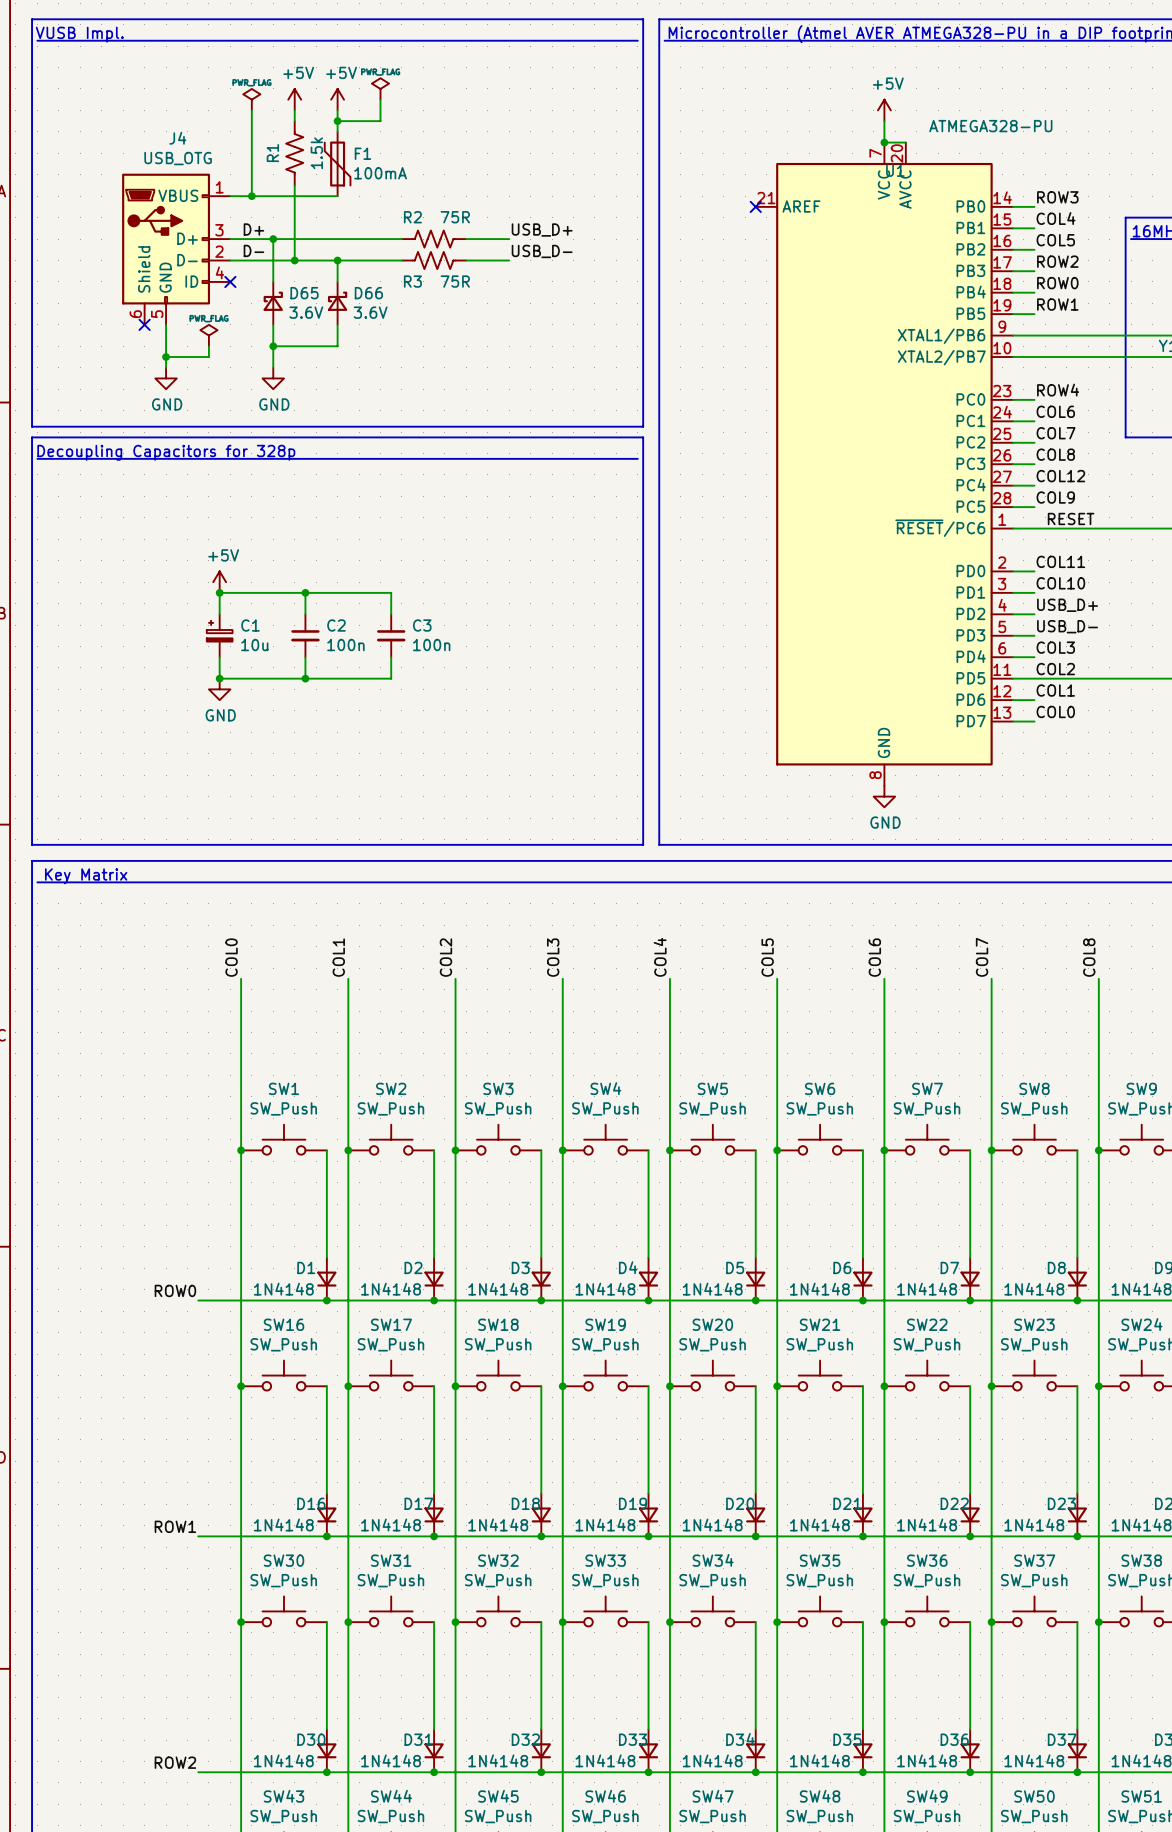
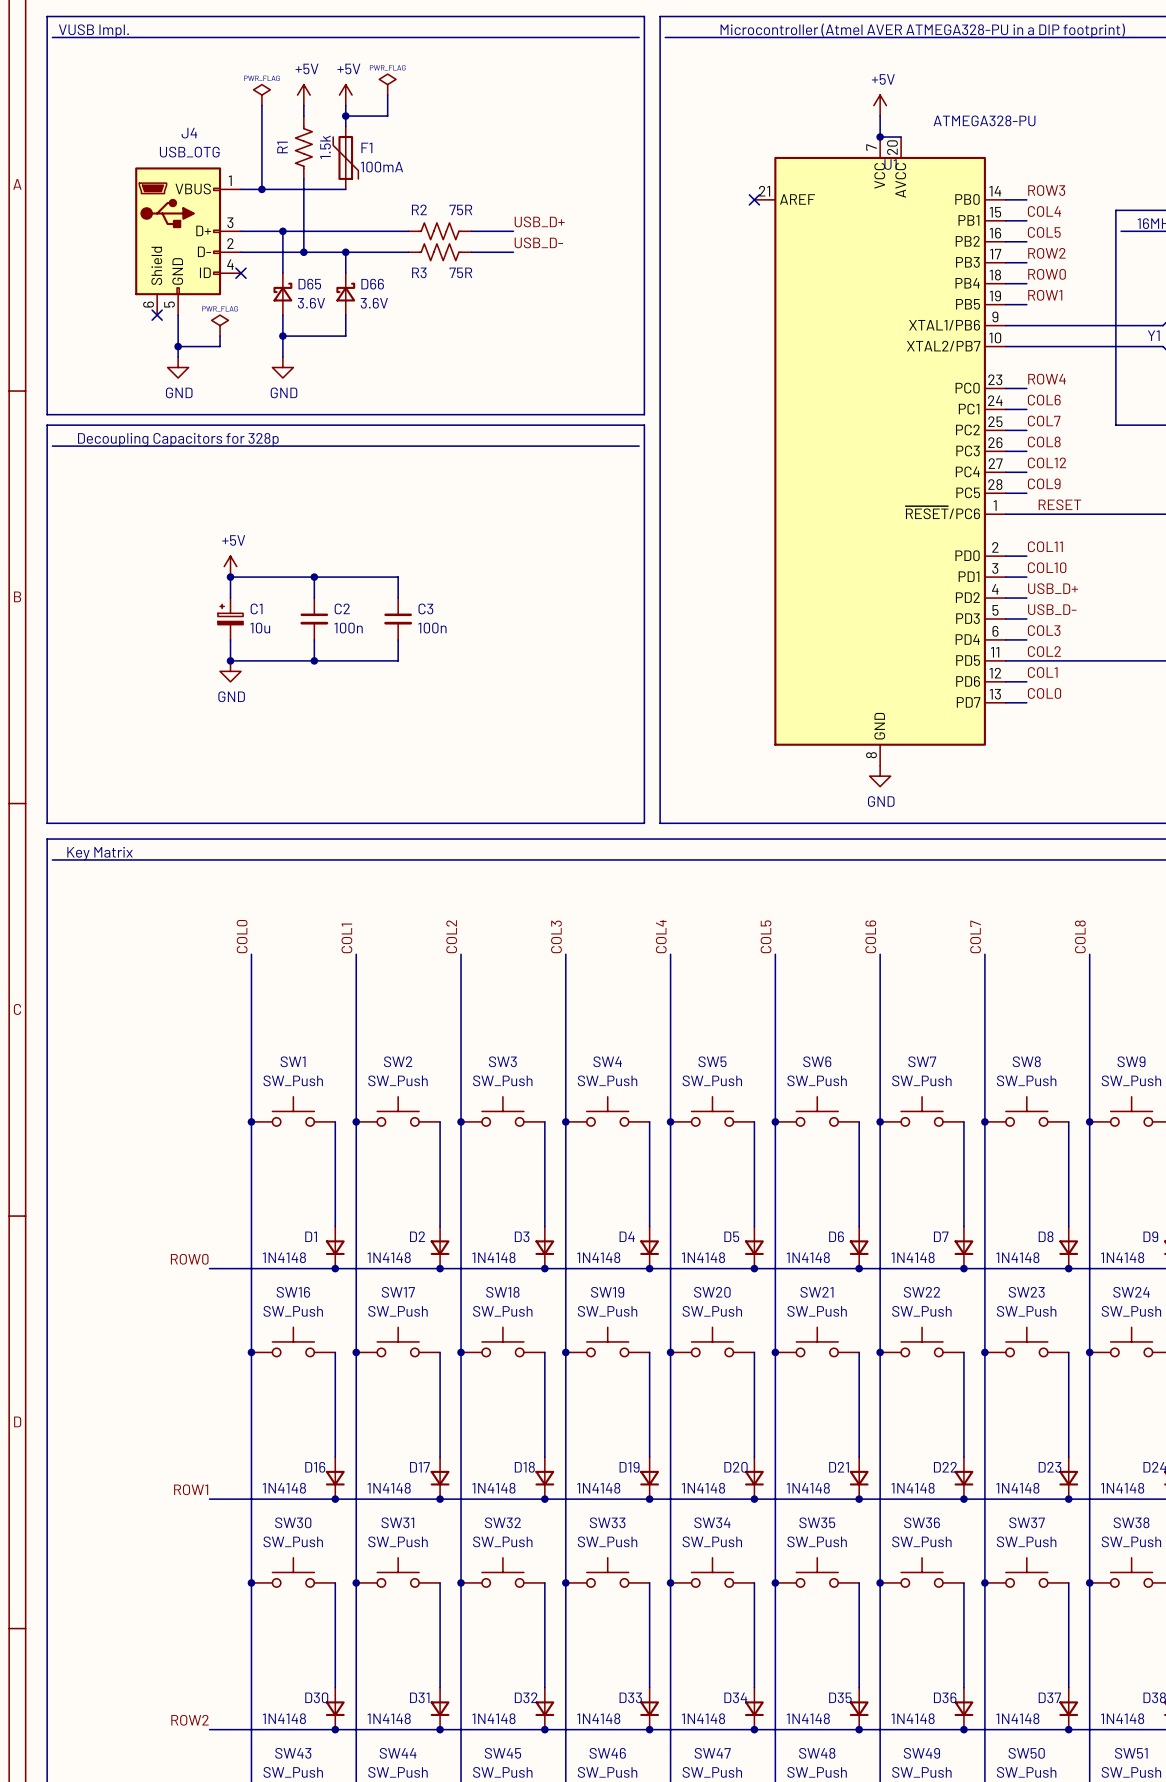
label: D+ (253, 229) -> none
label: D- (253, 250) -> none

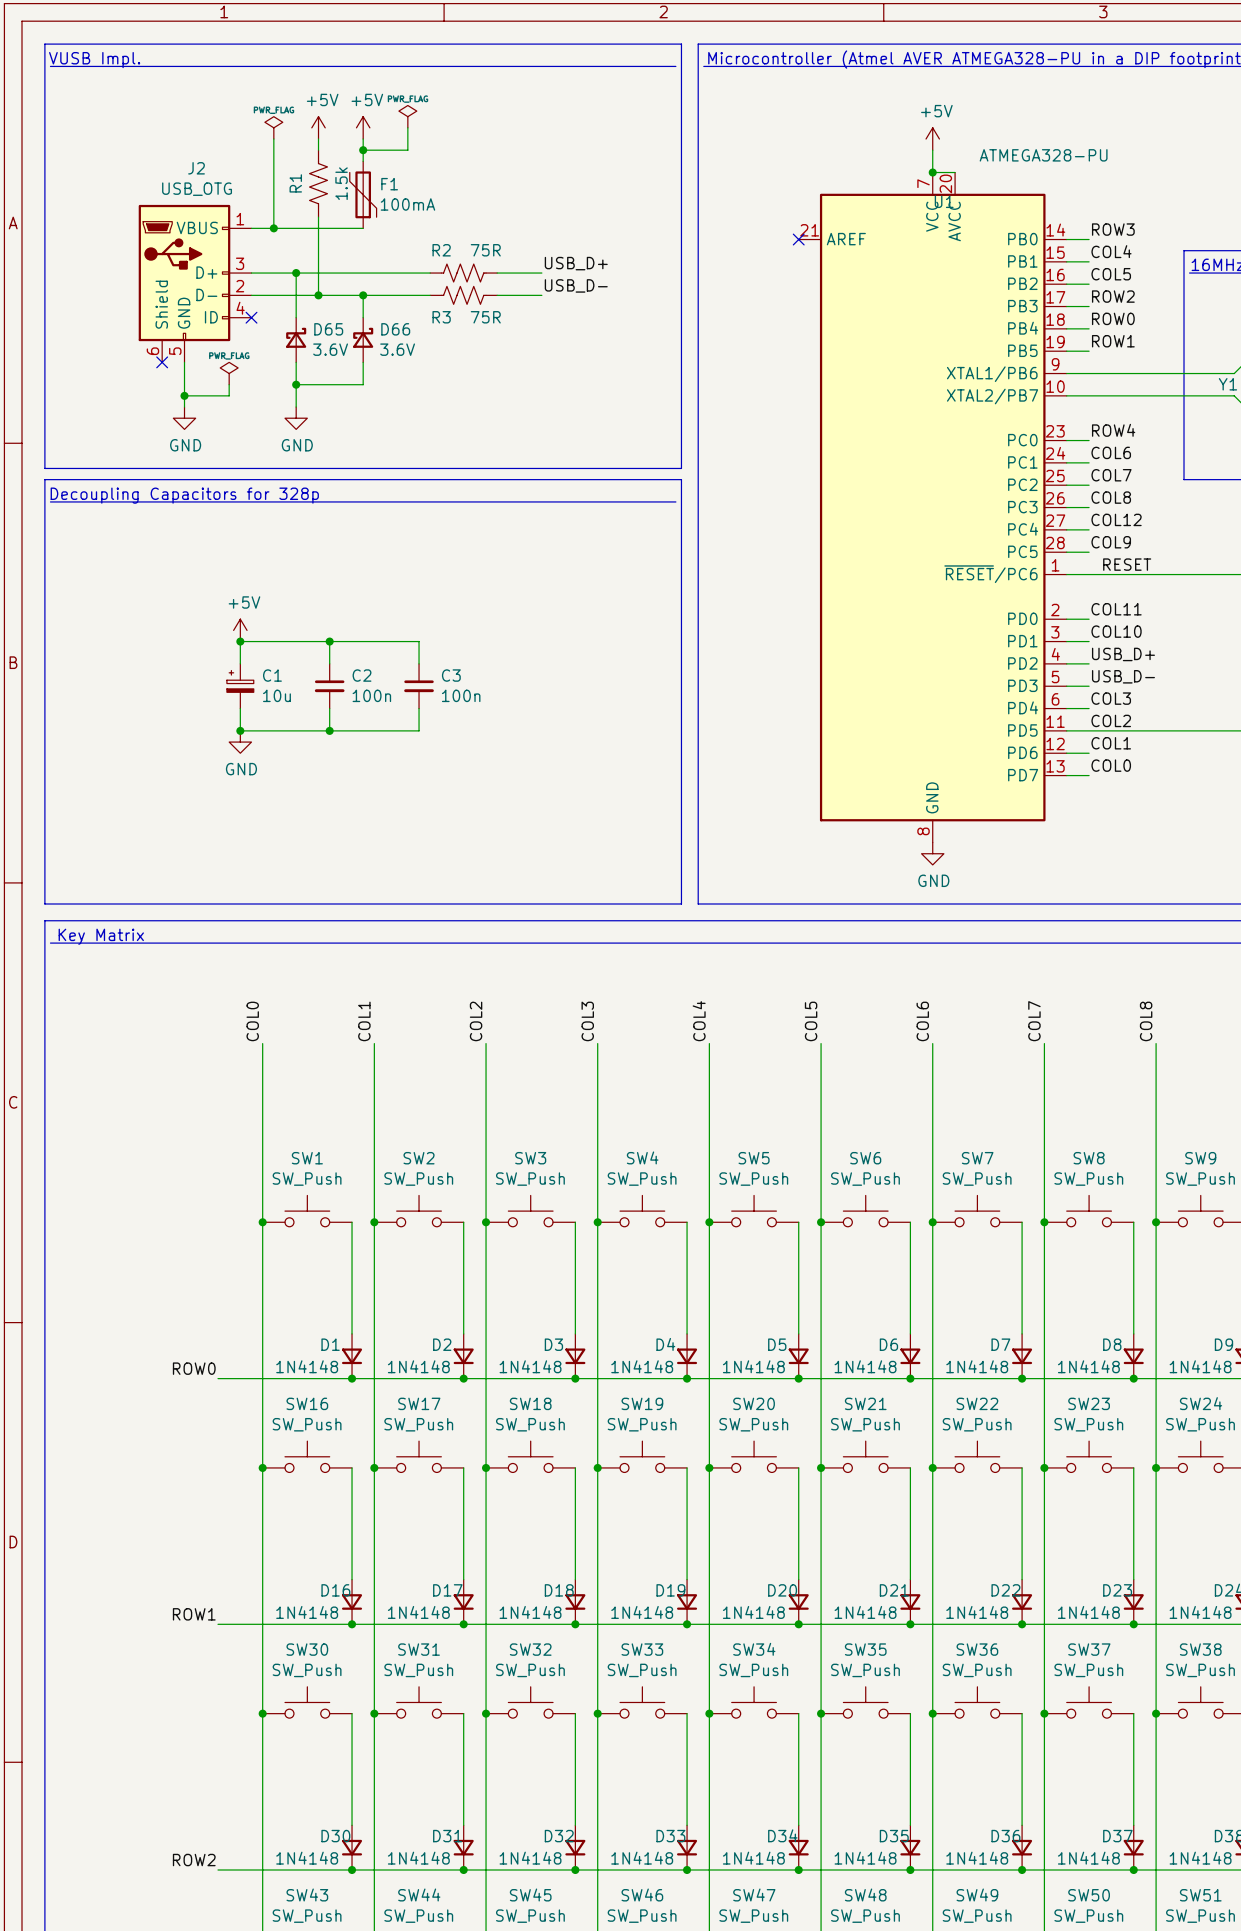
J4 name: J4 (189, 133) -> J2 (196, 168)

